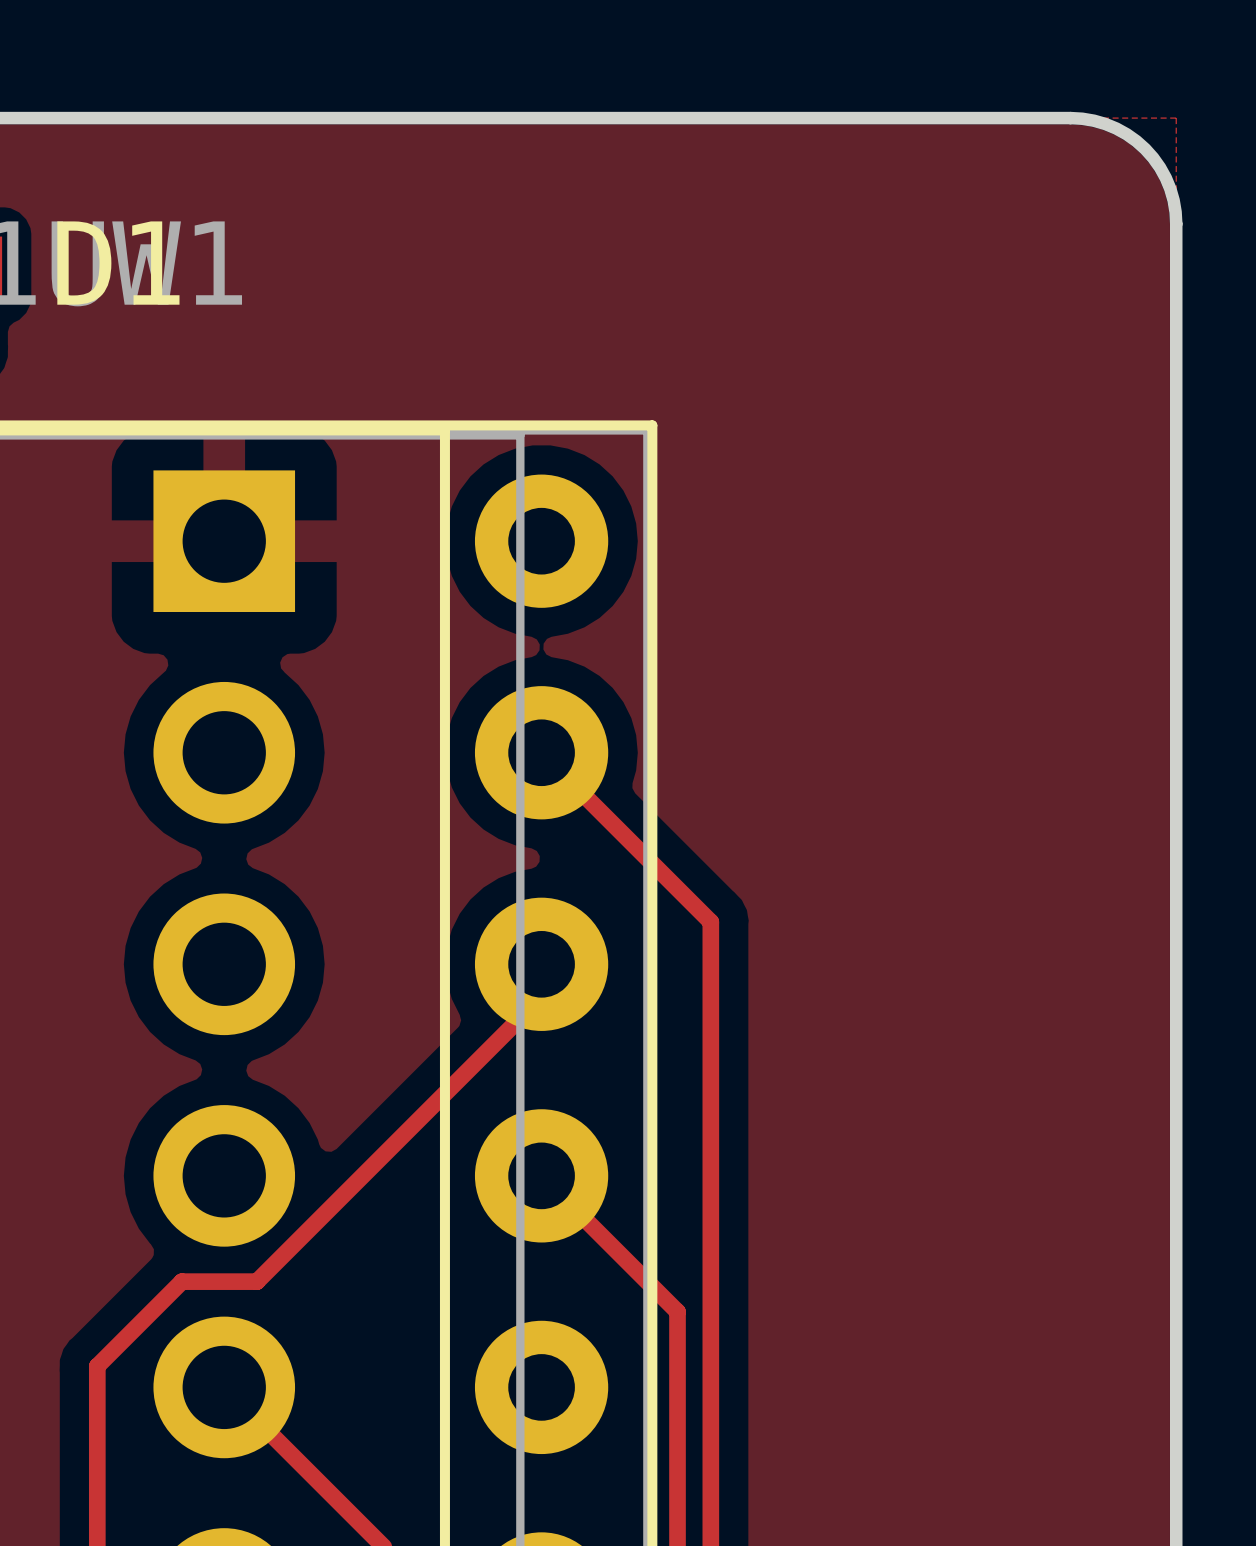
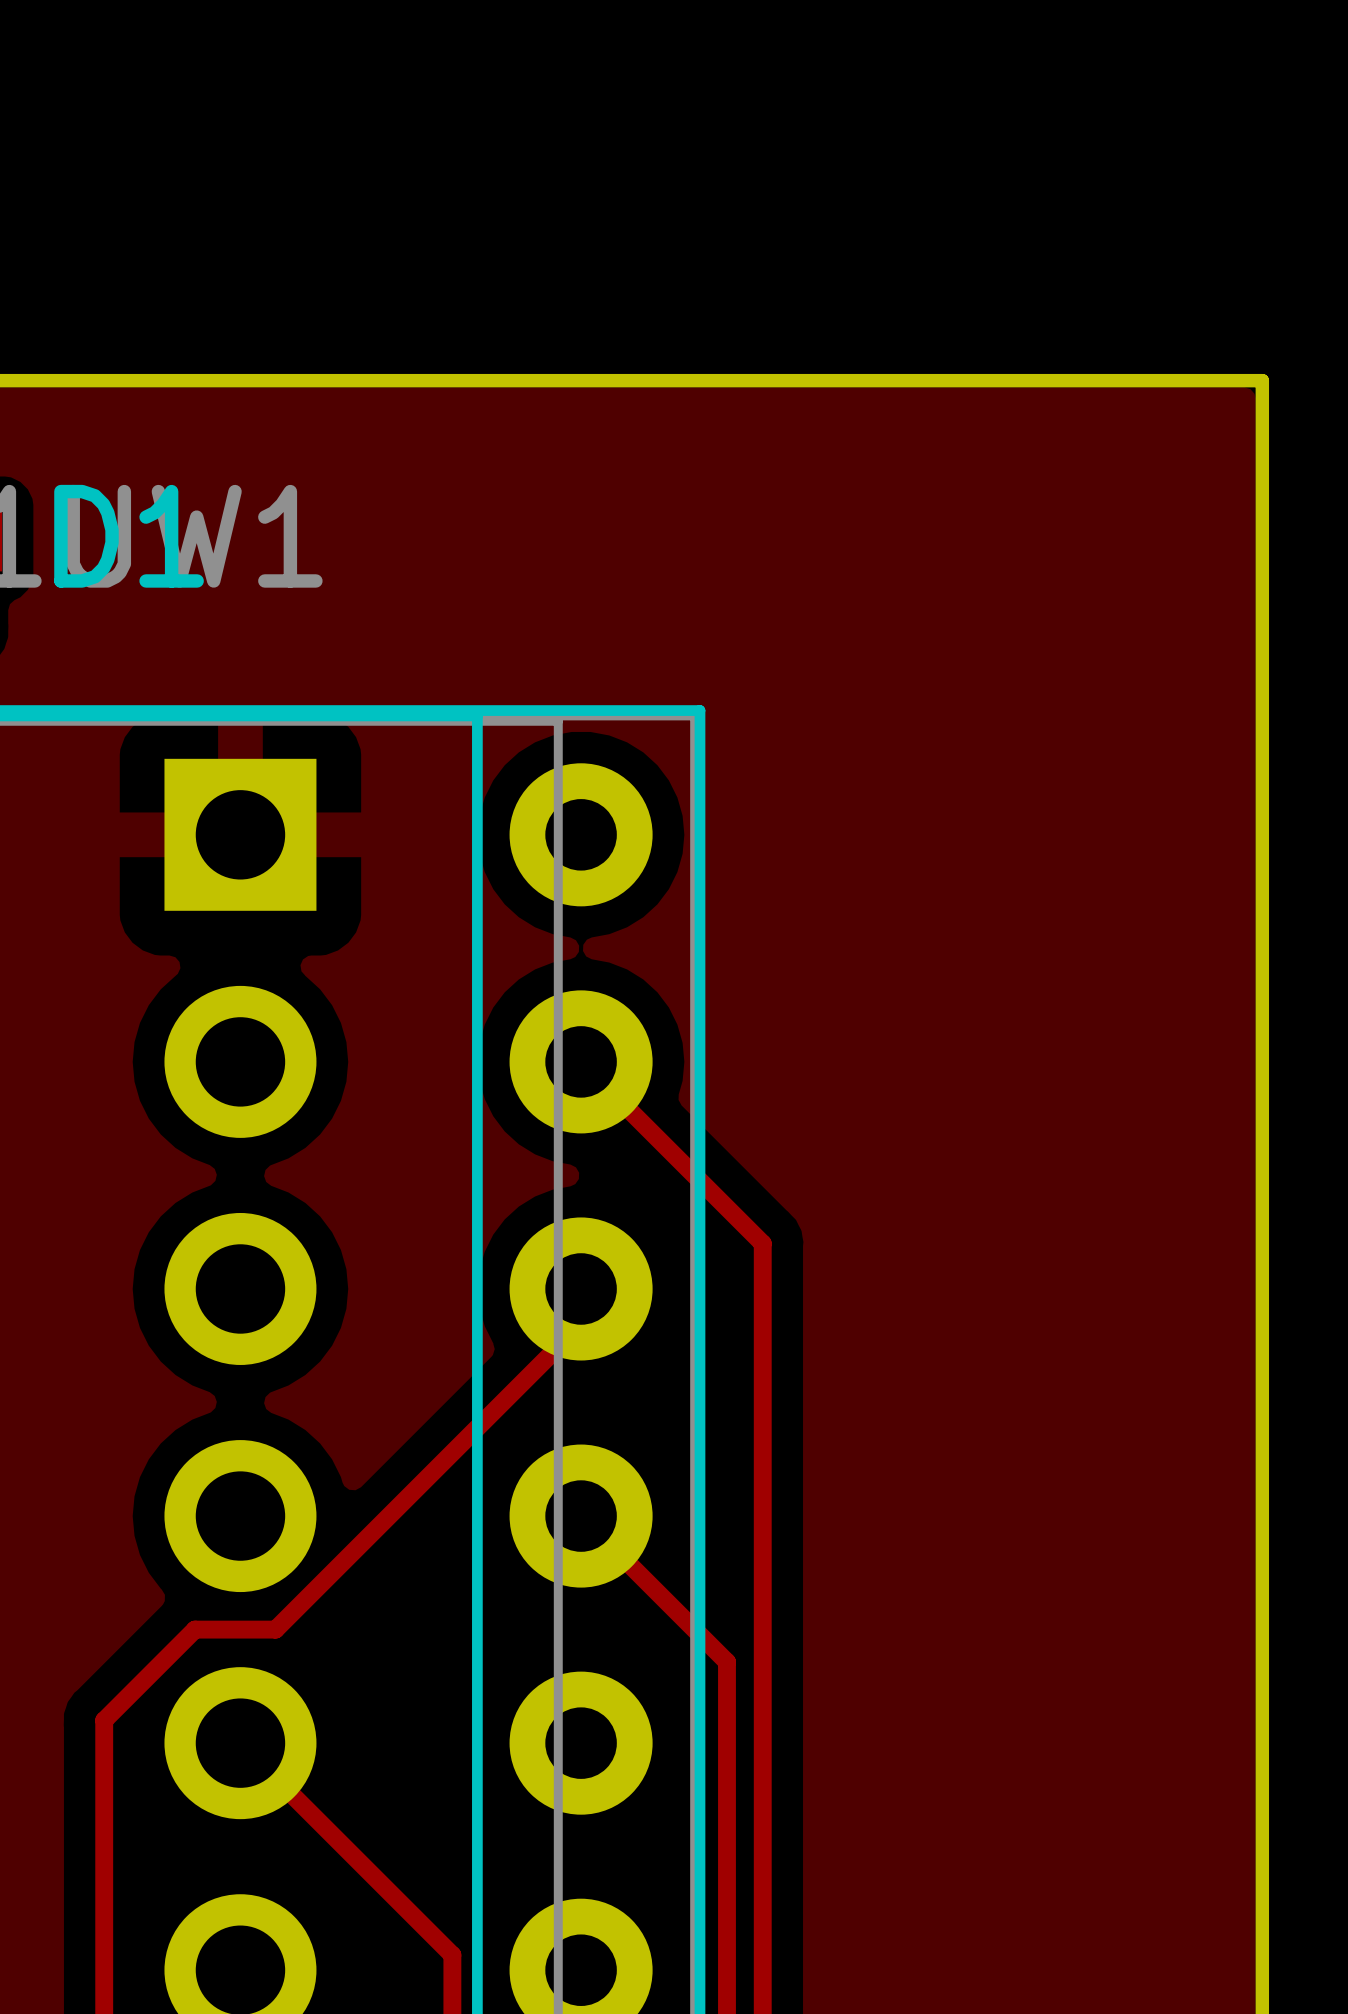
board edge: (1070, 118) (1105, 124) (1126, 134) (1145, 149) (1160, 167) (1170, 188) (1176, 223) -> (1148, 380) (1262, 380) (1262, 494)

